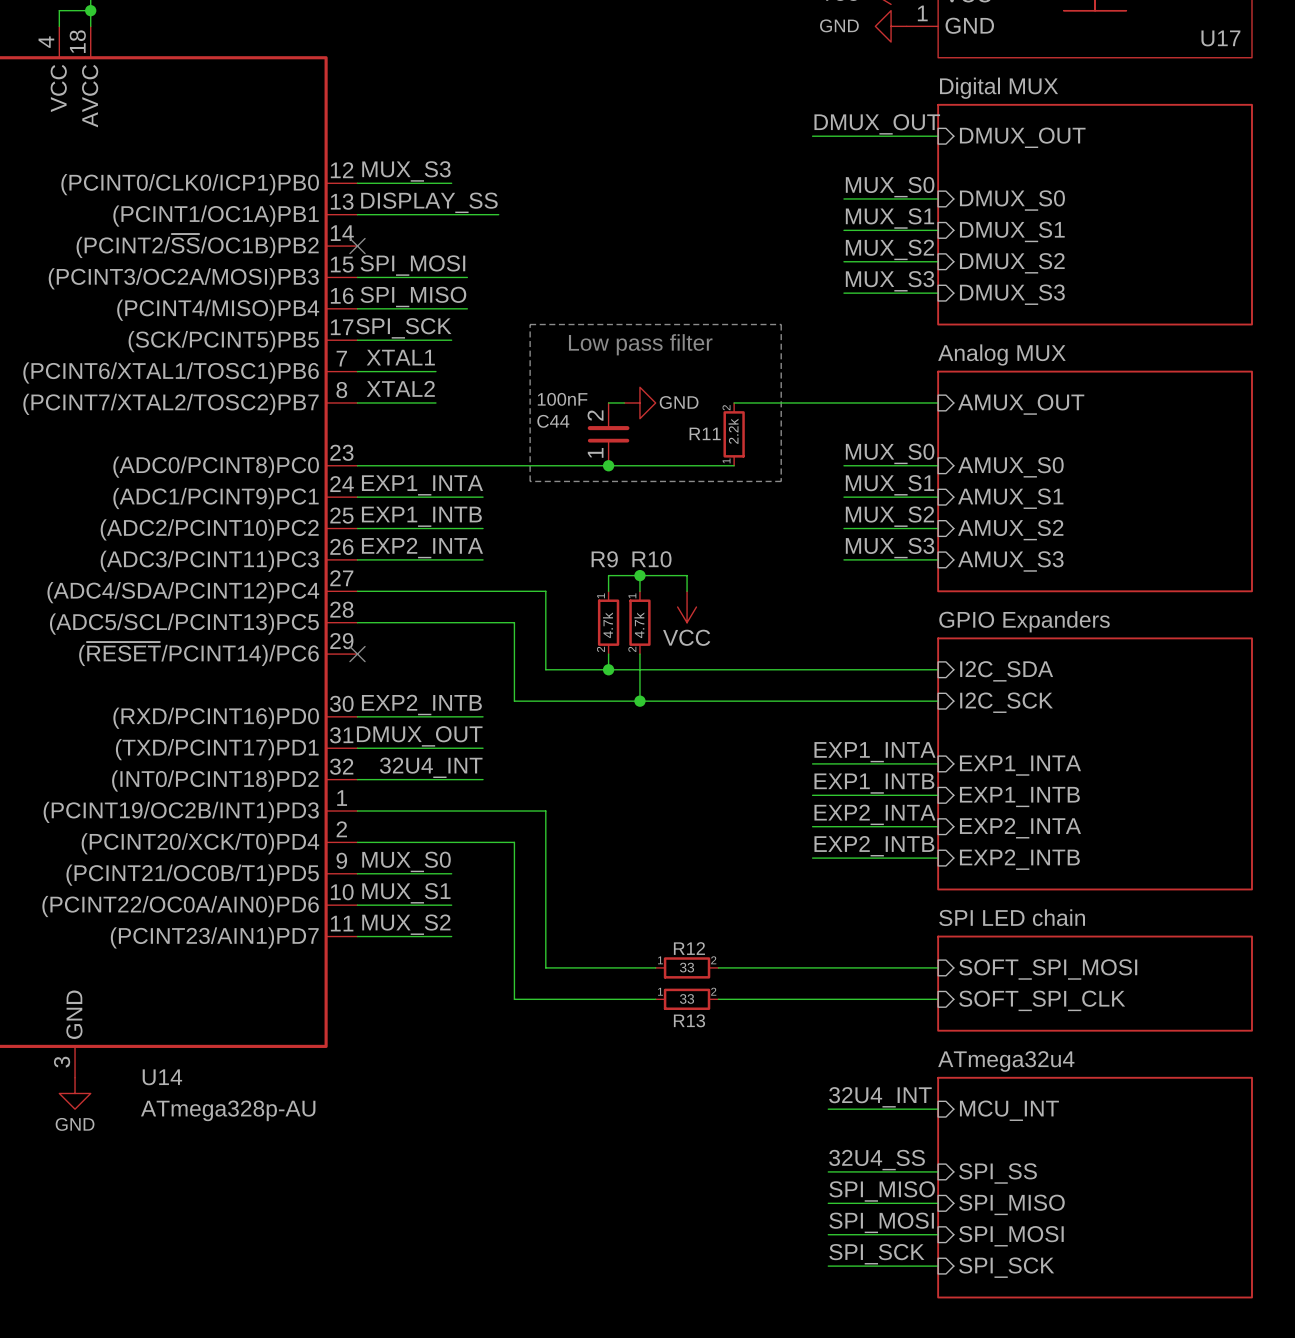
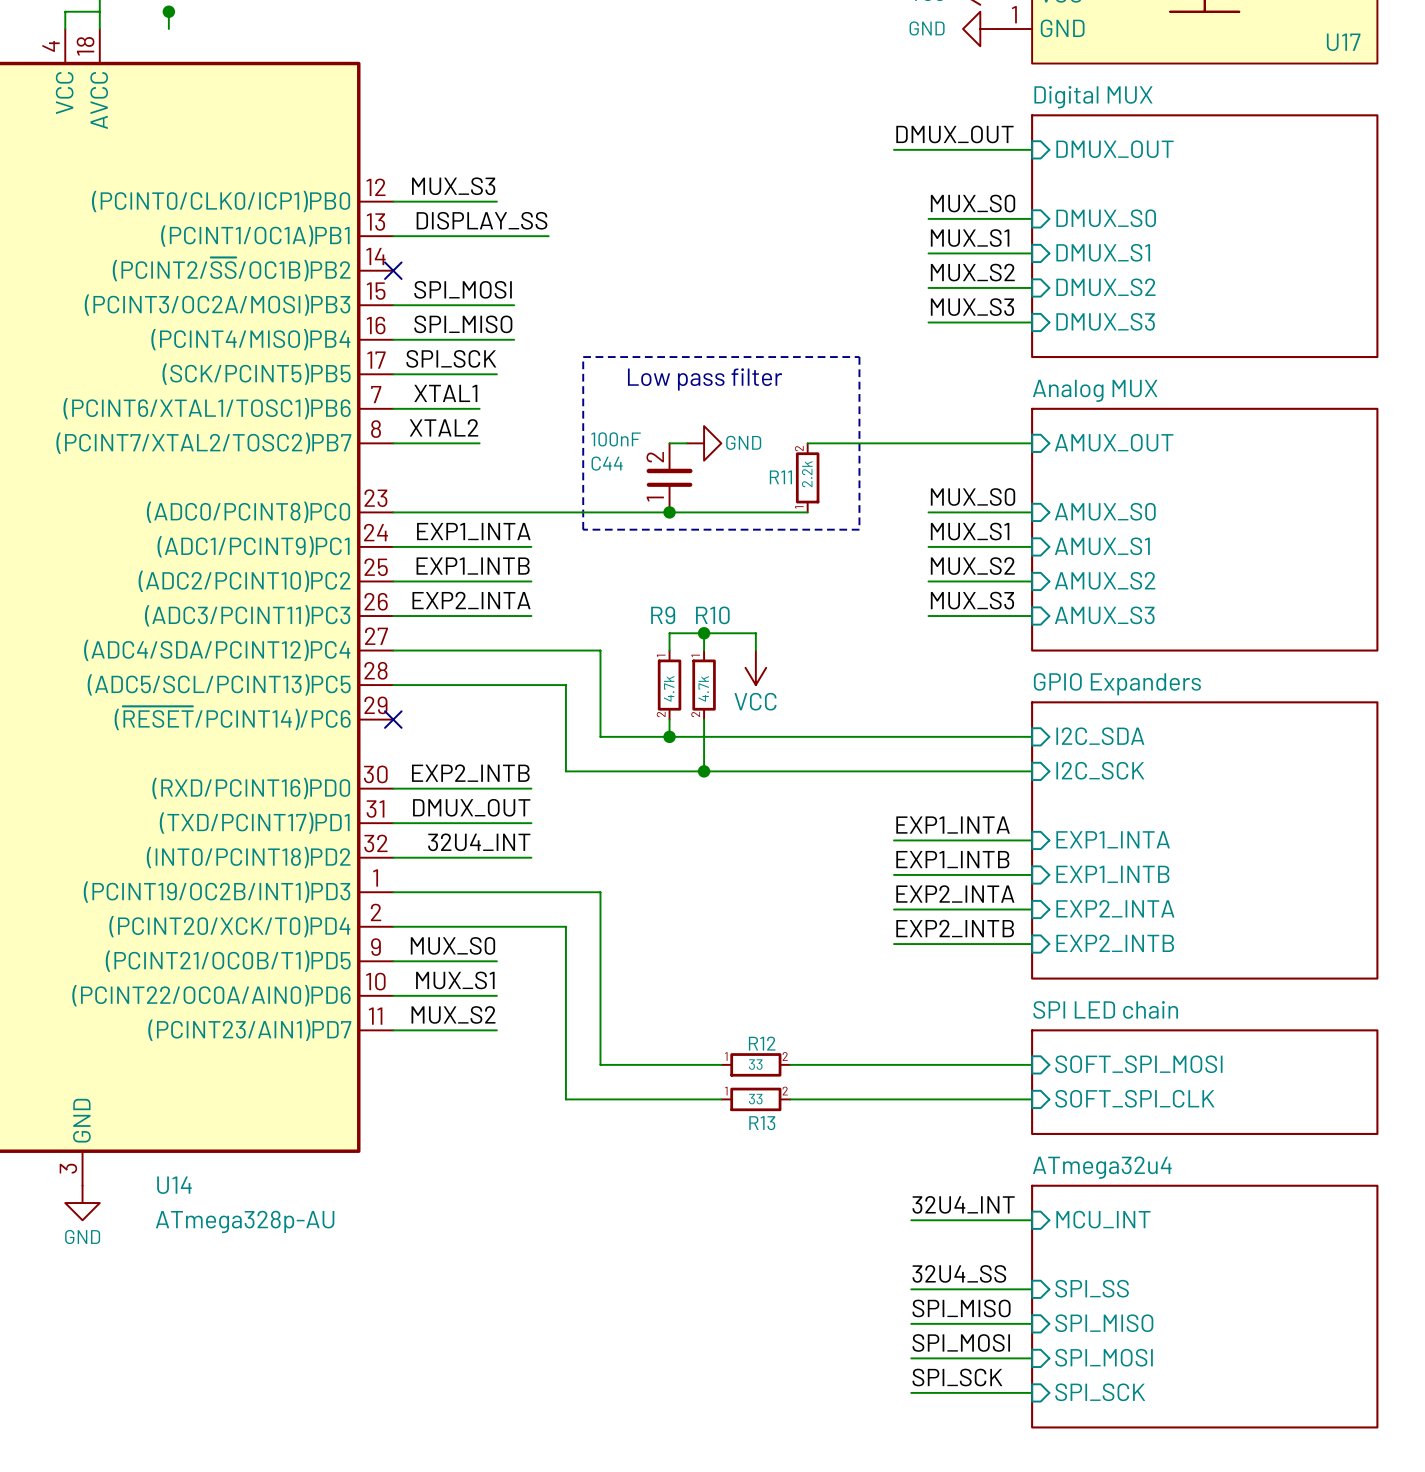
junction: (90, 10) -> none
wire: none -> (168, 11) (168, 29)
junction: none -> (168, 11)

